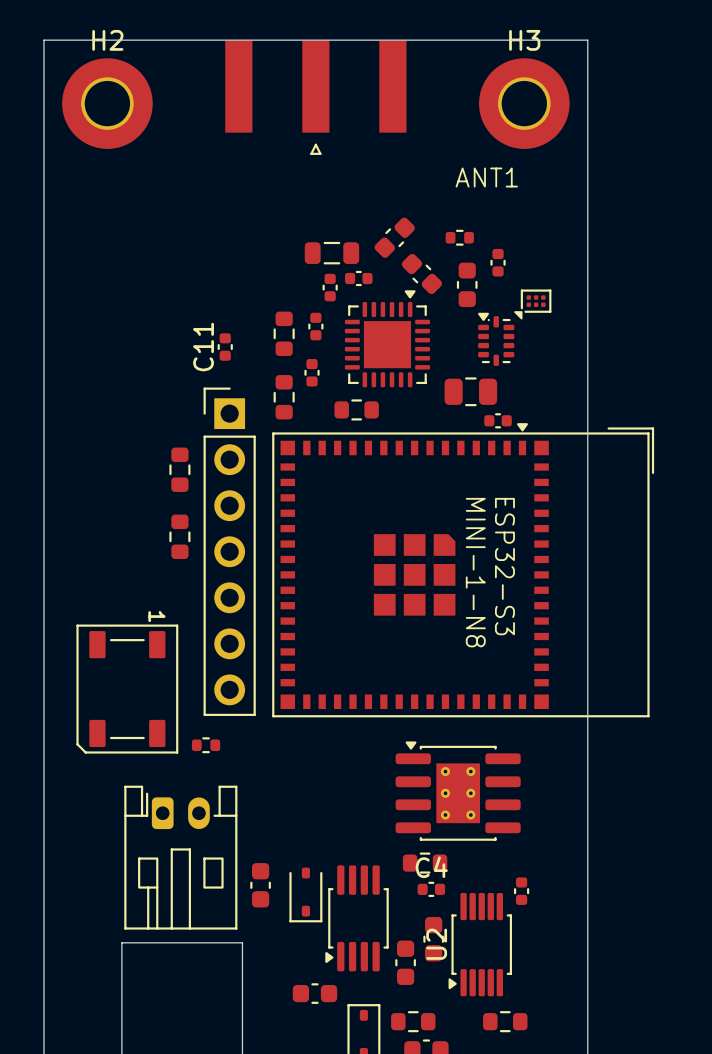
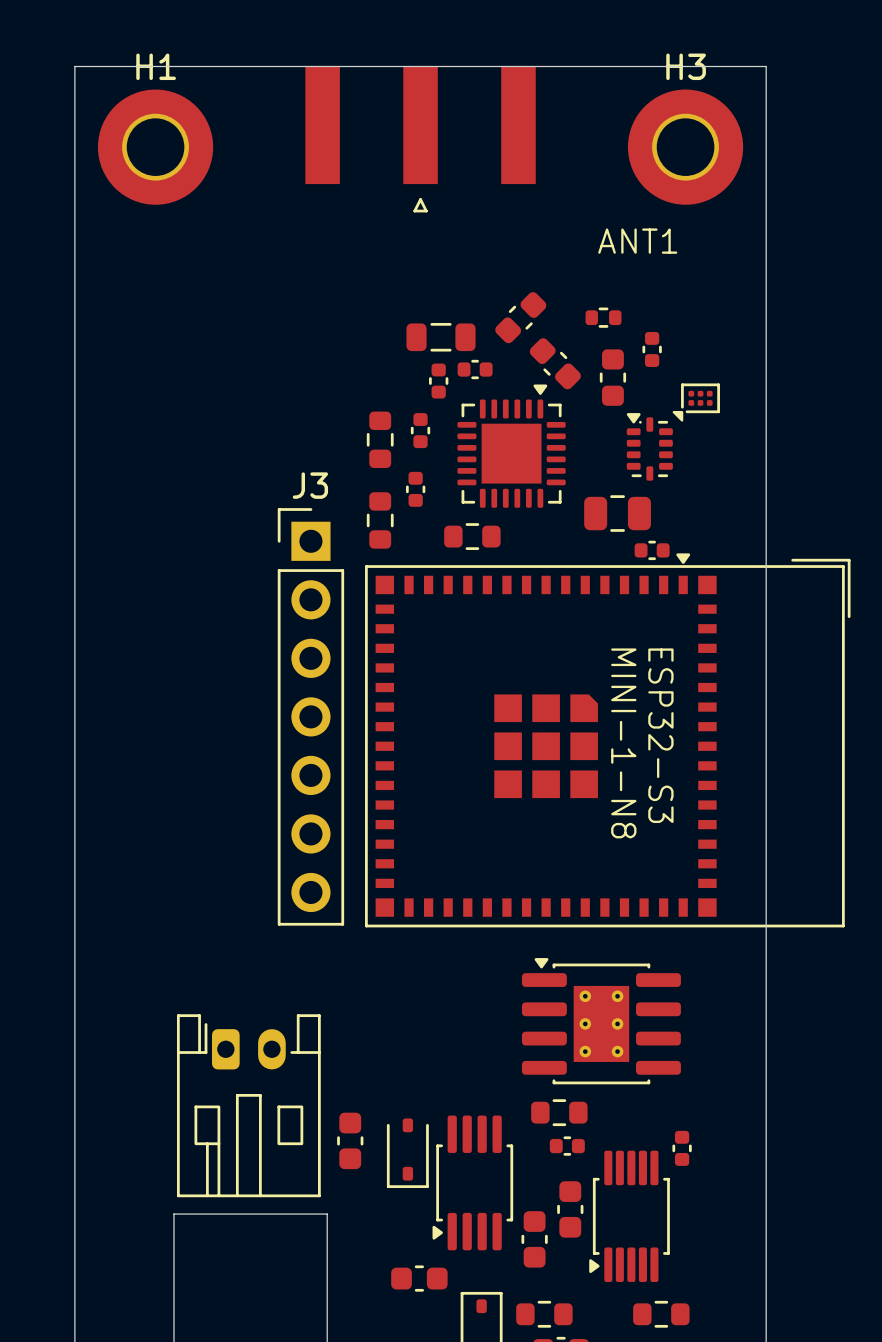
H2 name: H2 (107, 40) -> H1 (156, 66)
C11: (225, 347) -> none
J3 name: none -> J3 (310, 485)
part: (179, 469) -> none
part: (179, 536) -> none
part: (127, 689) -> none
part: (206, 745) -> none
C4 name: C4 (431, 867) -> none
U2 name: U2 (436, 944) -> none

